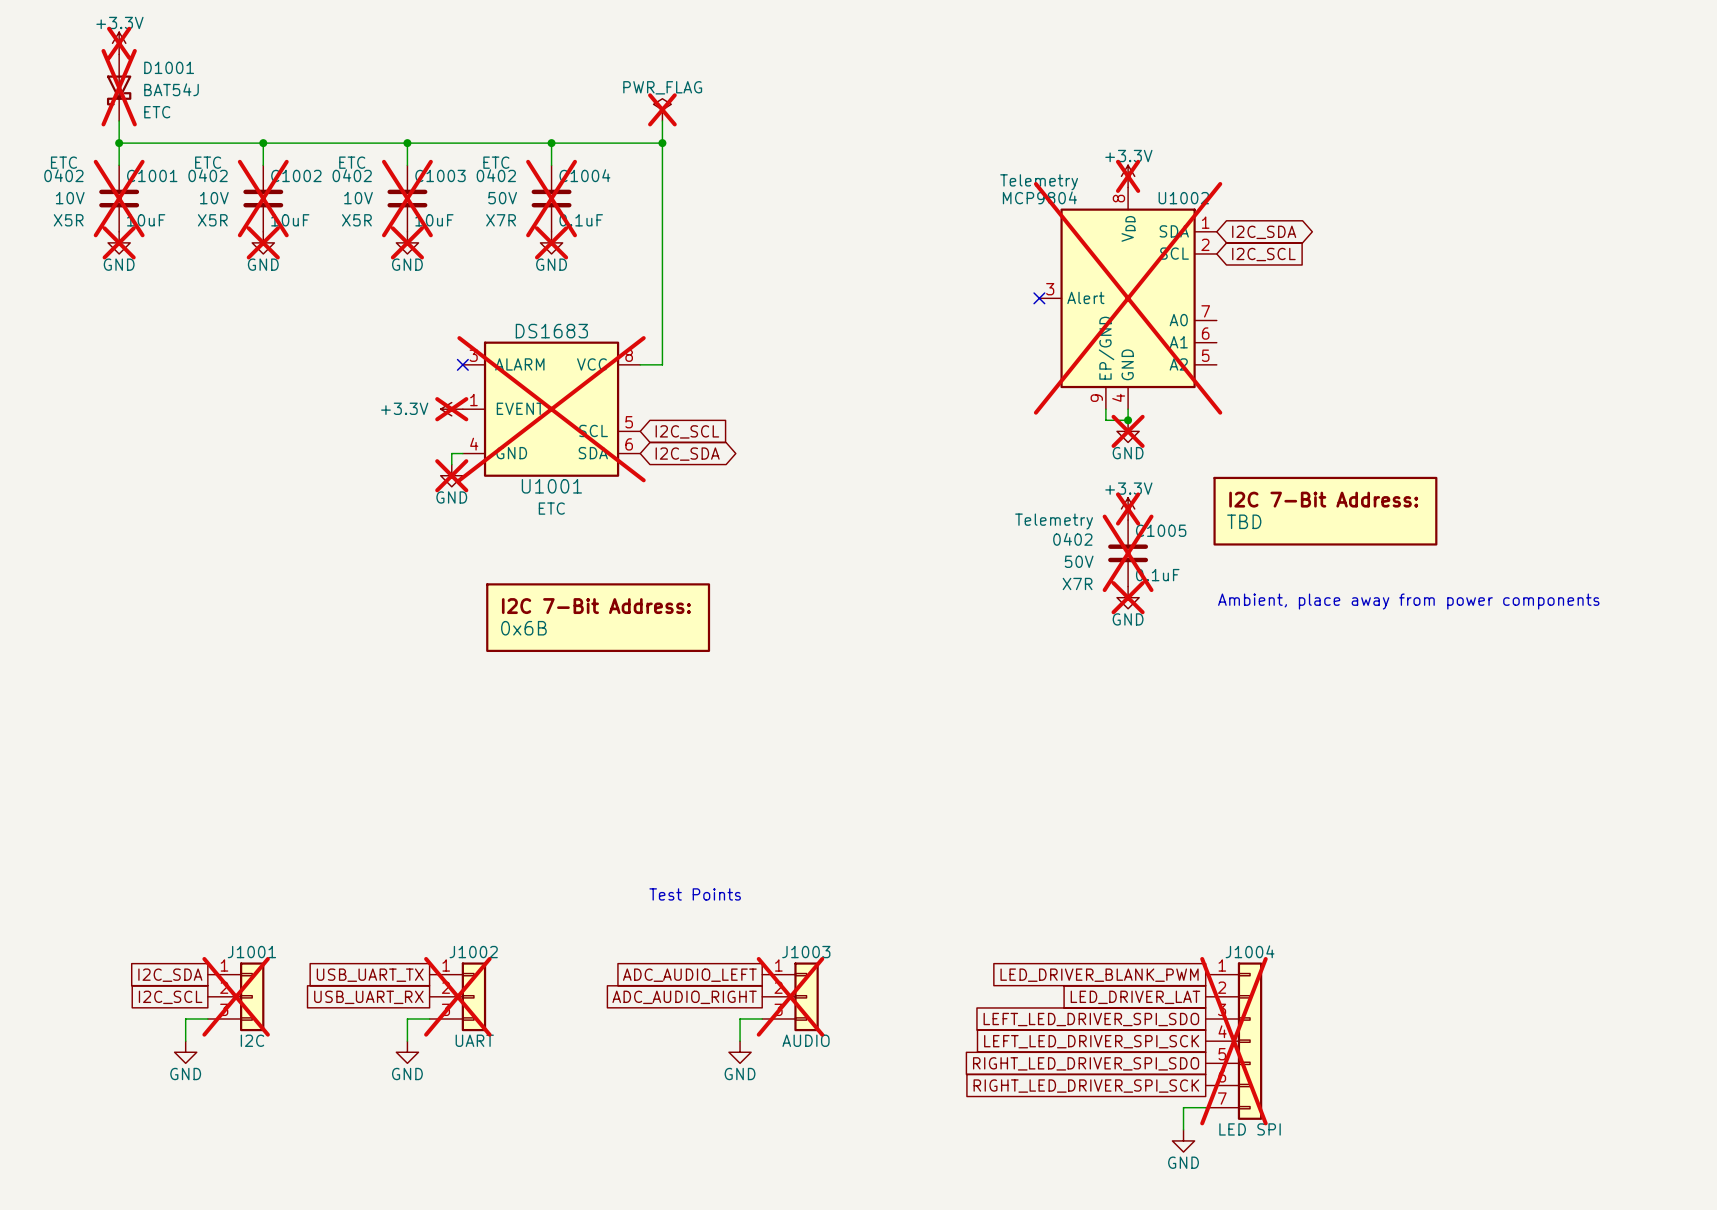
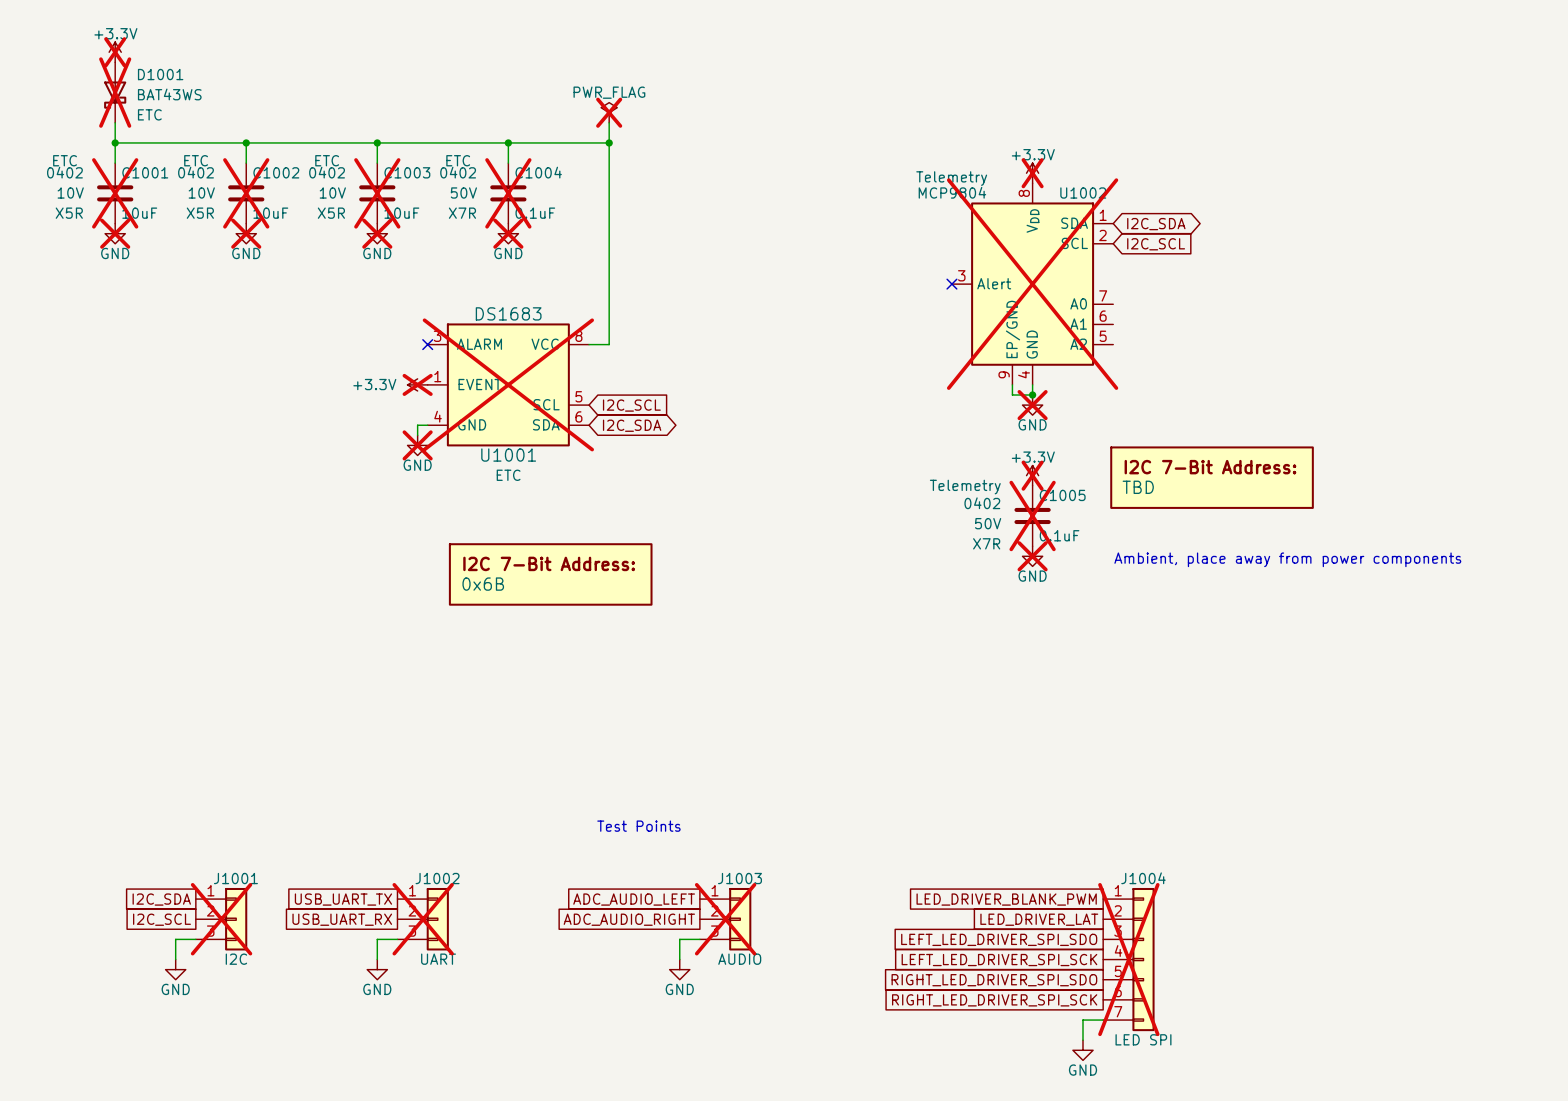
D1001 value: BAT54J (171, 89) -> BAT43WS (169, 94)

